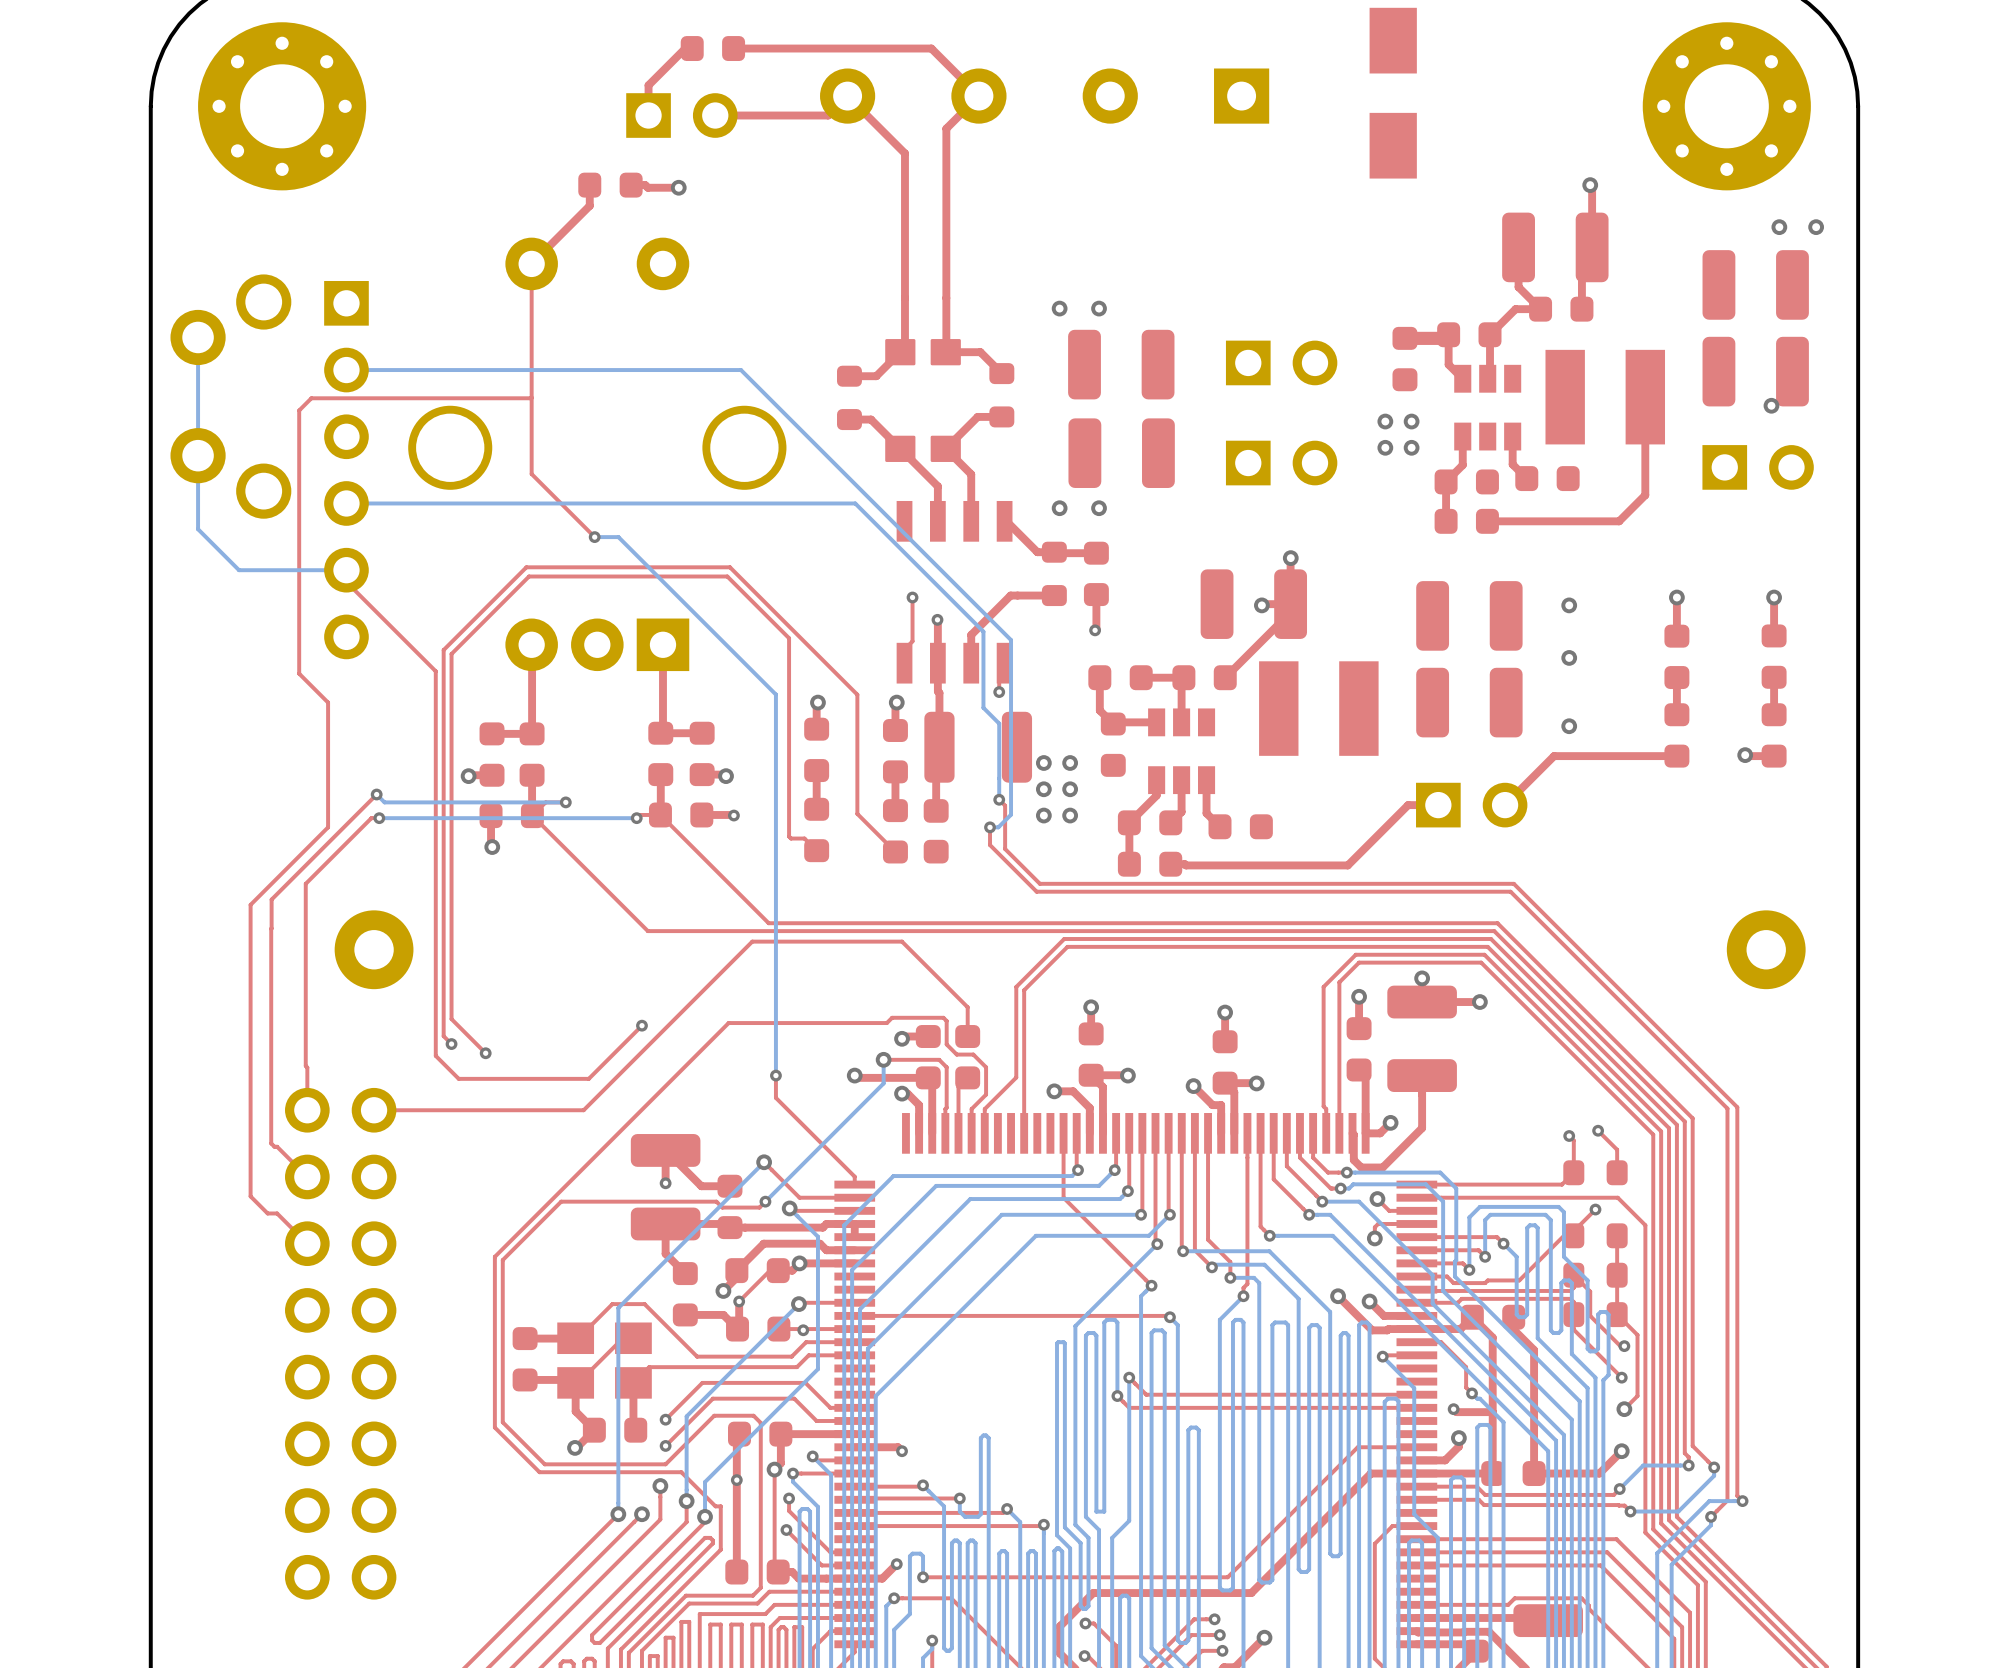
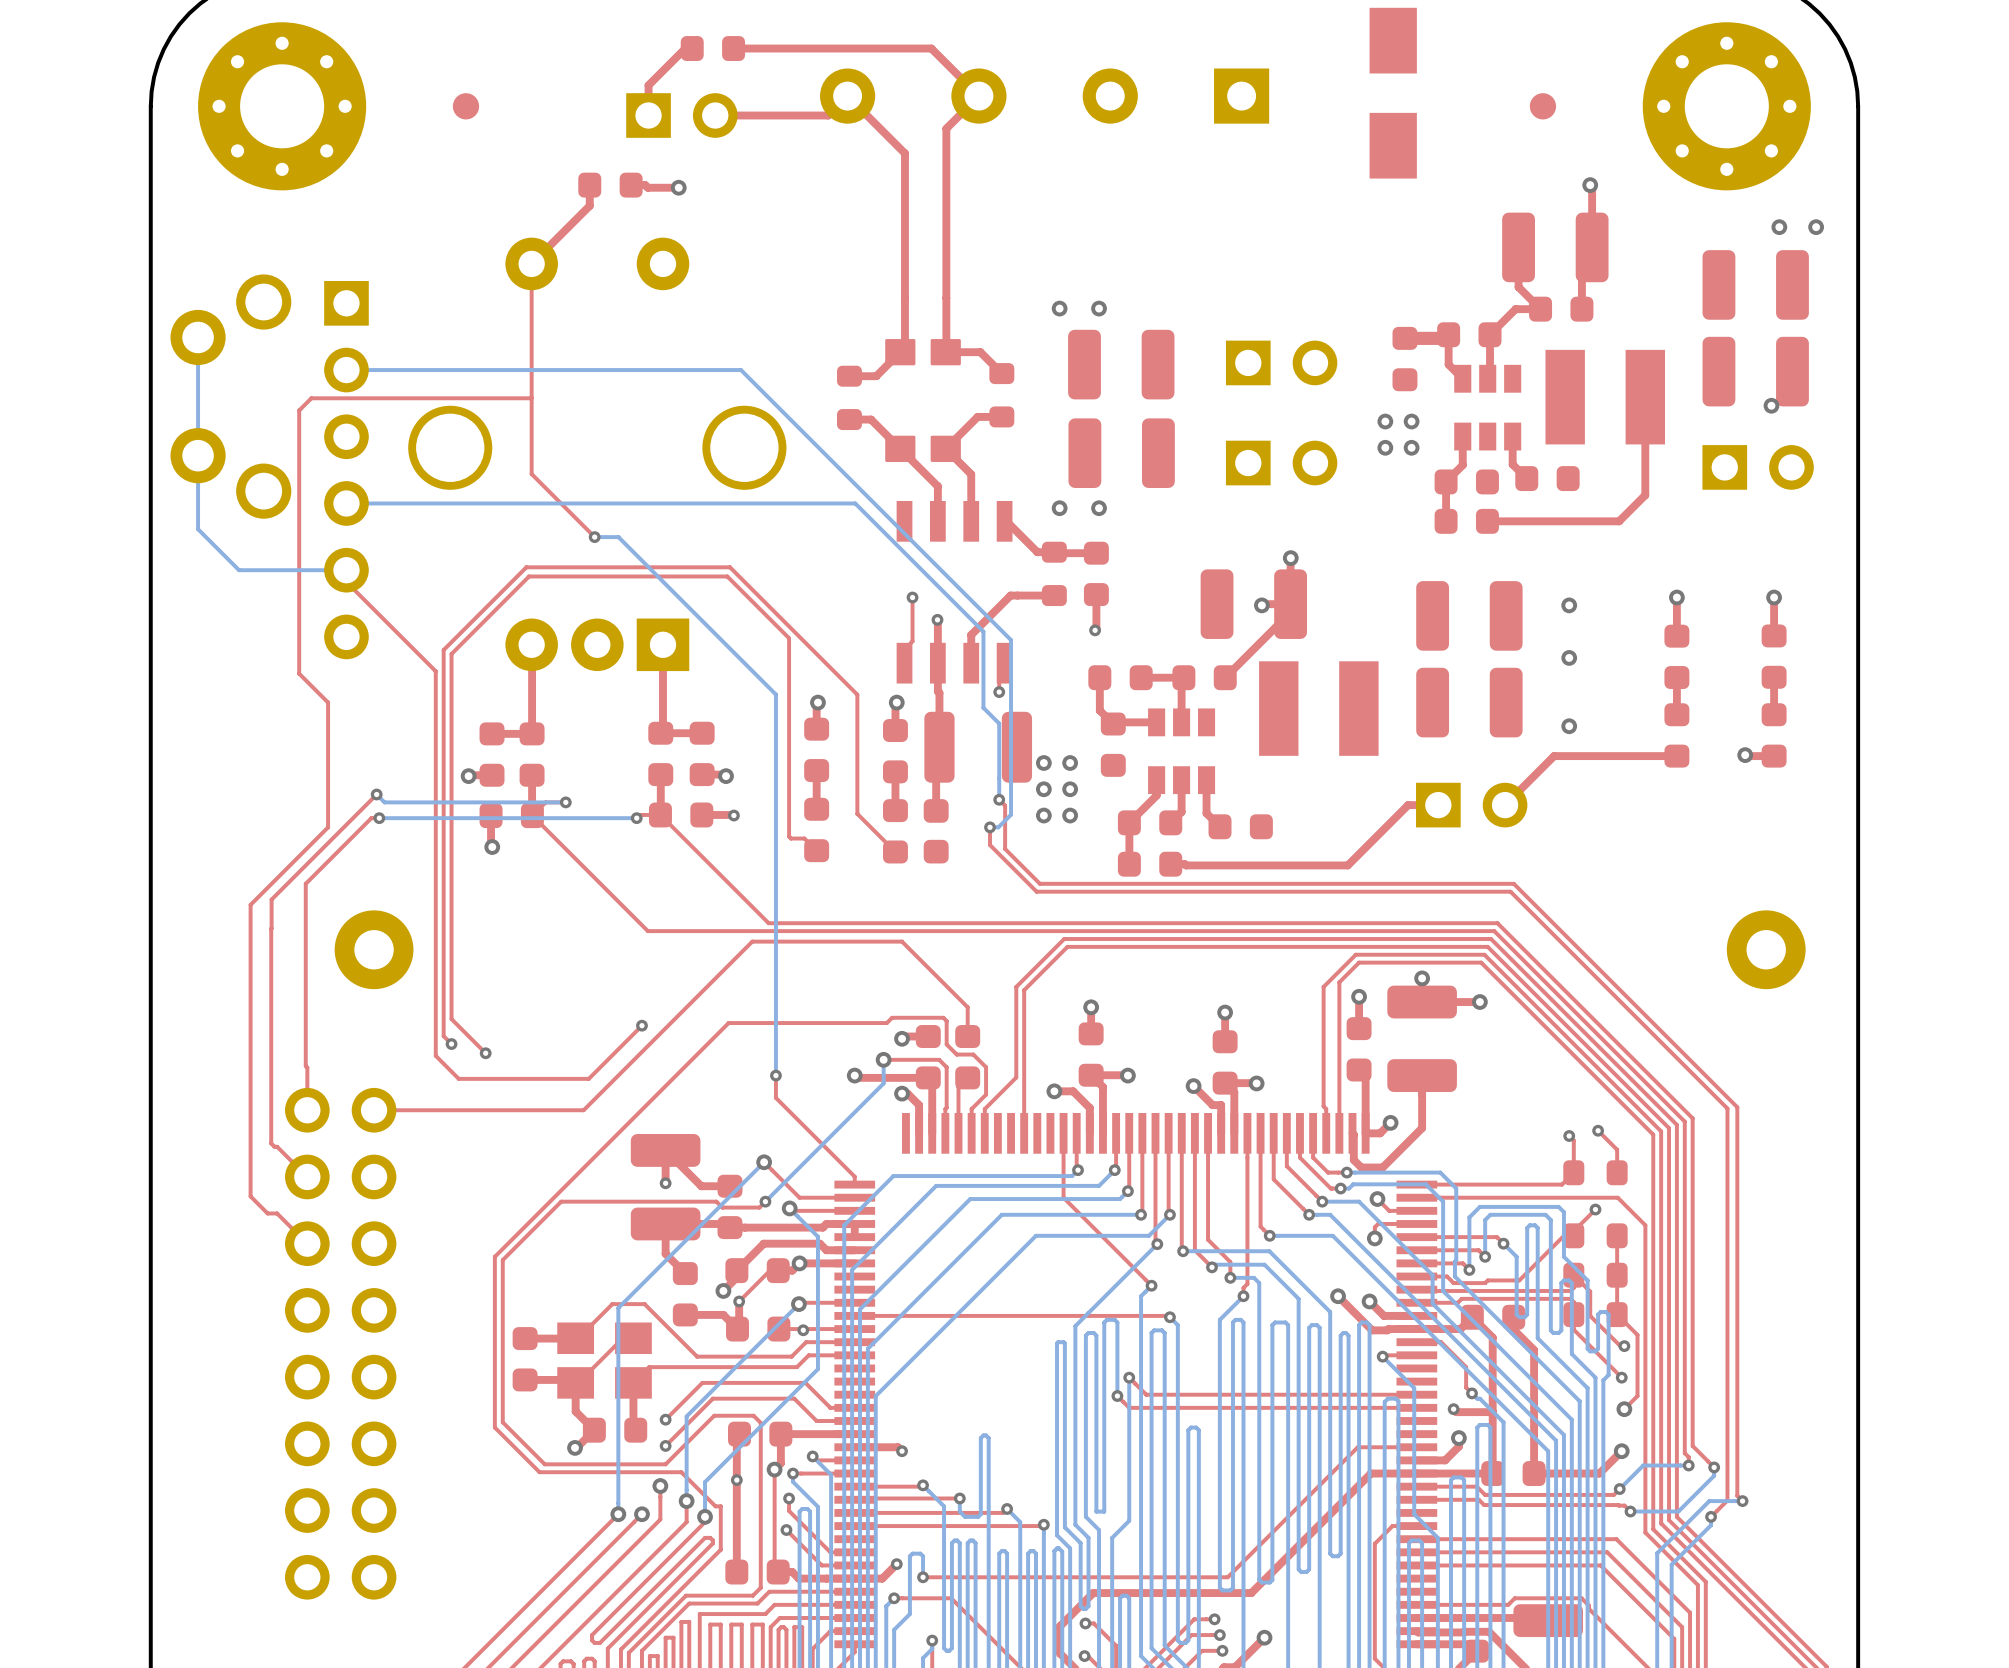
part: none -> (465, 106)
part: none -> (1542, 106)

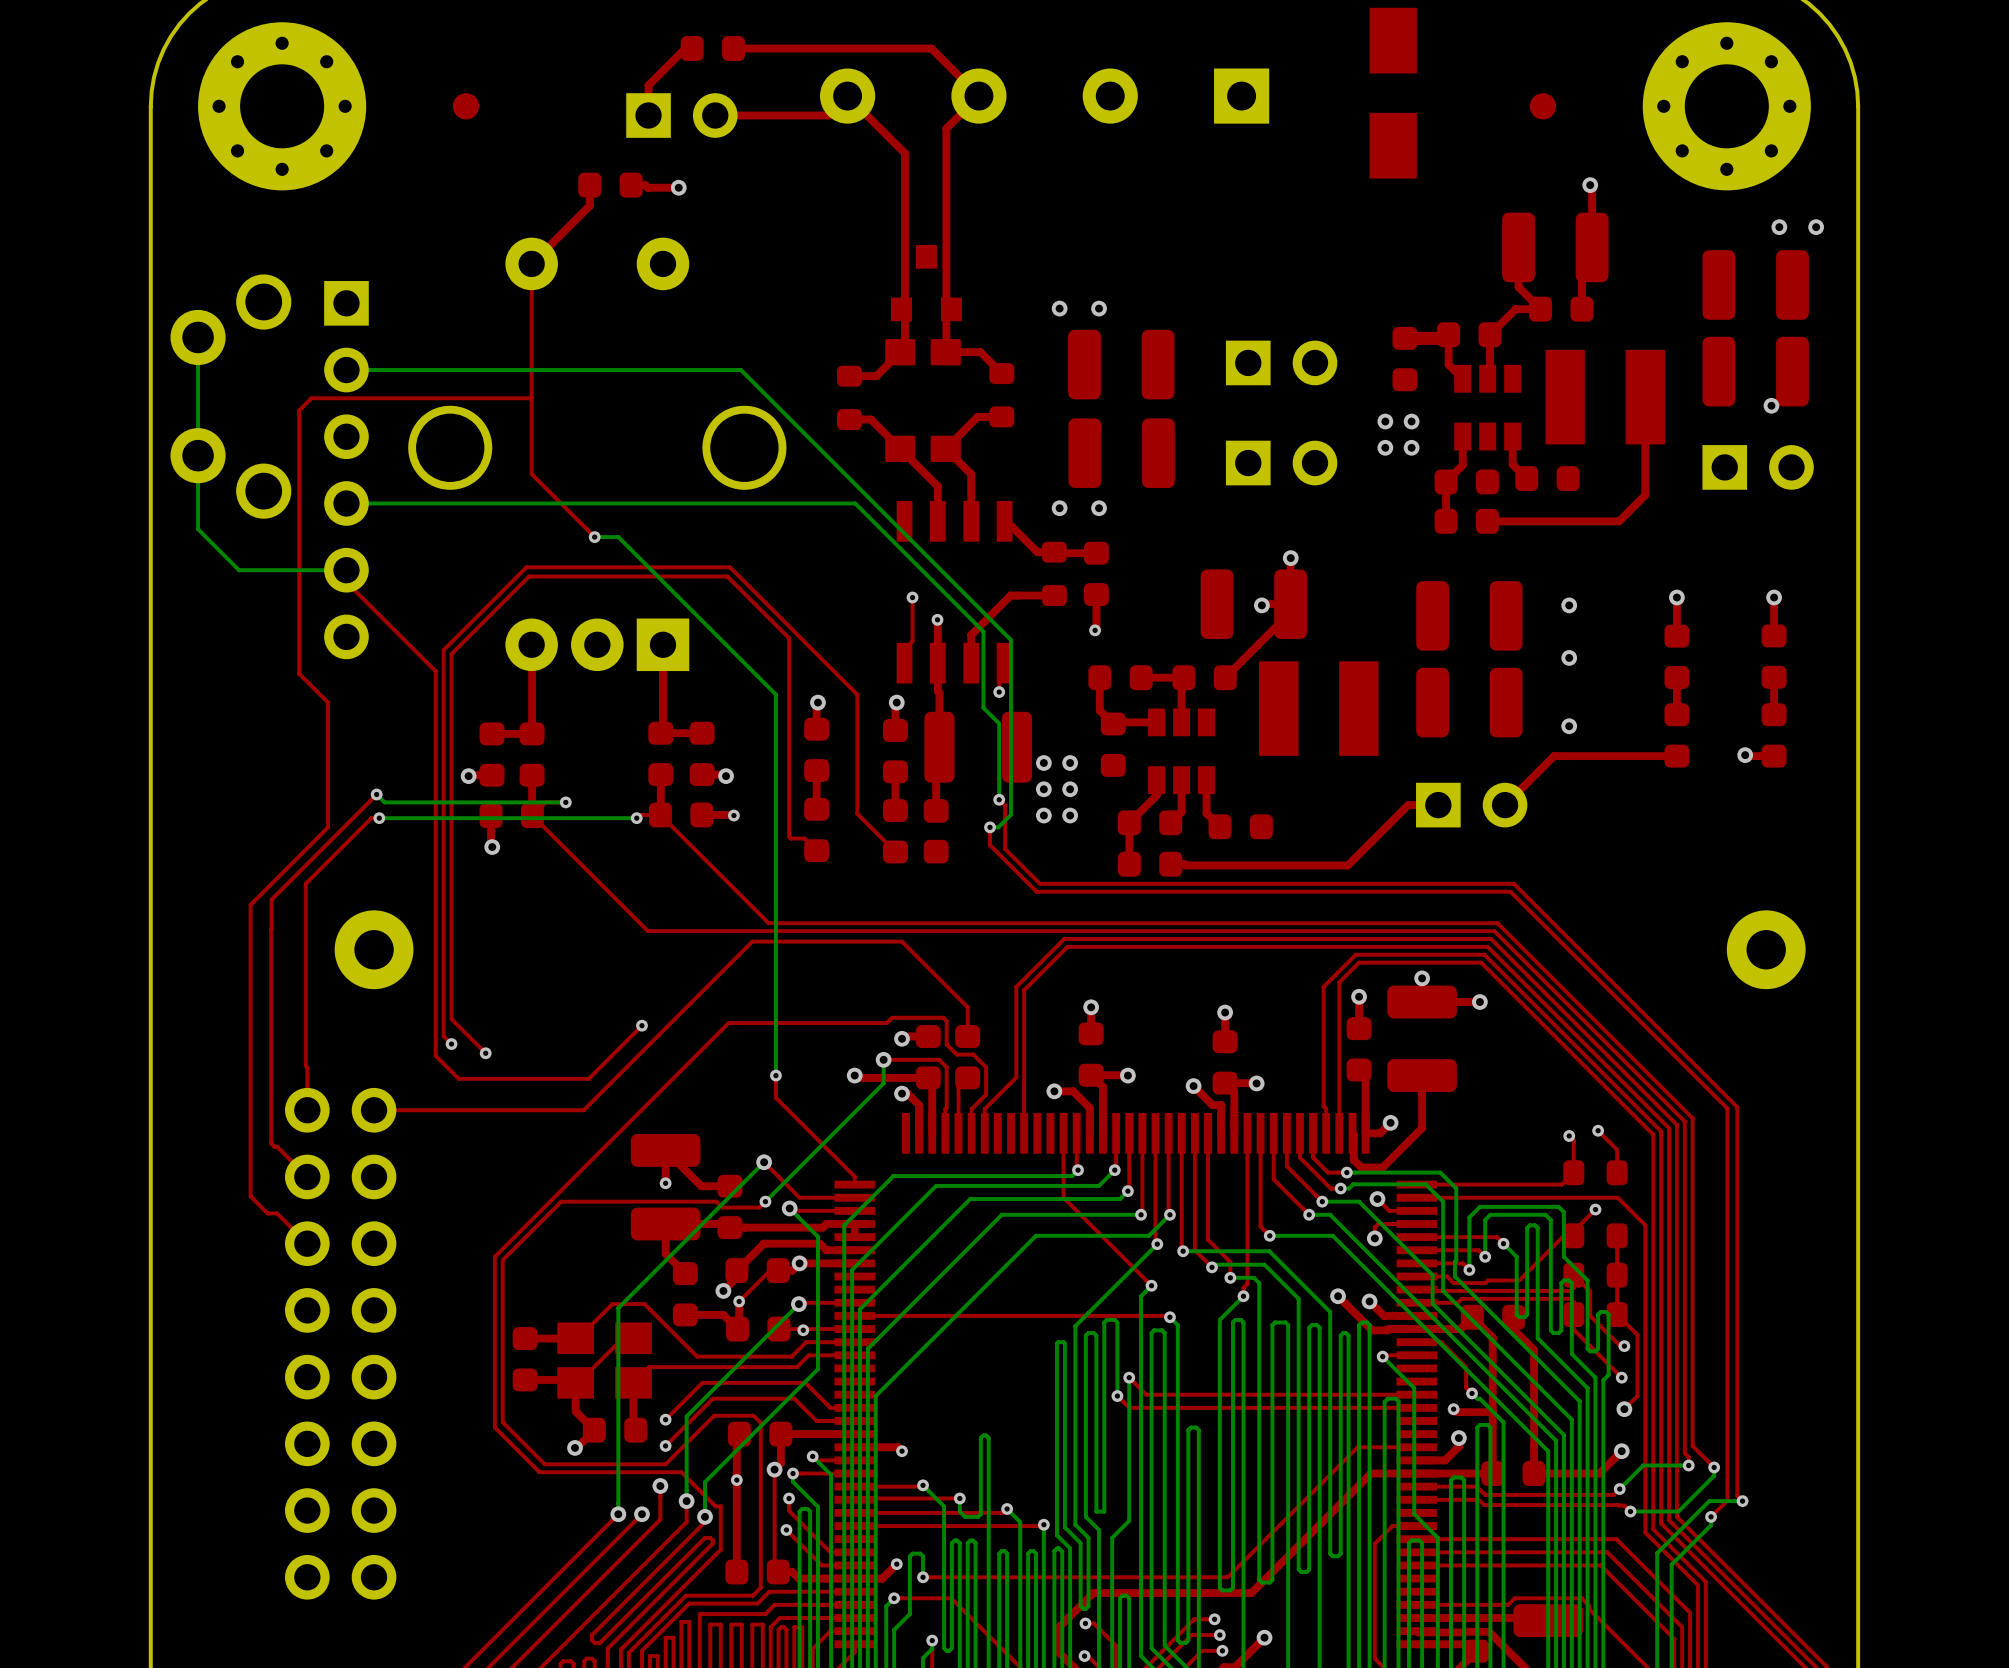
part: none -> (926, 283)

